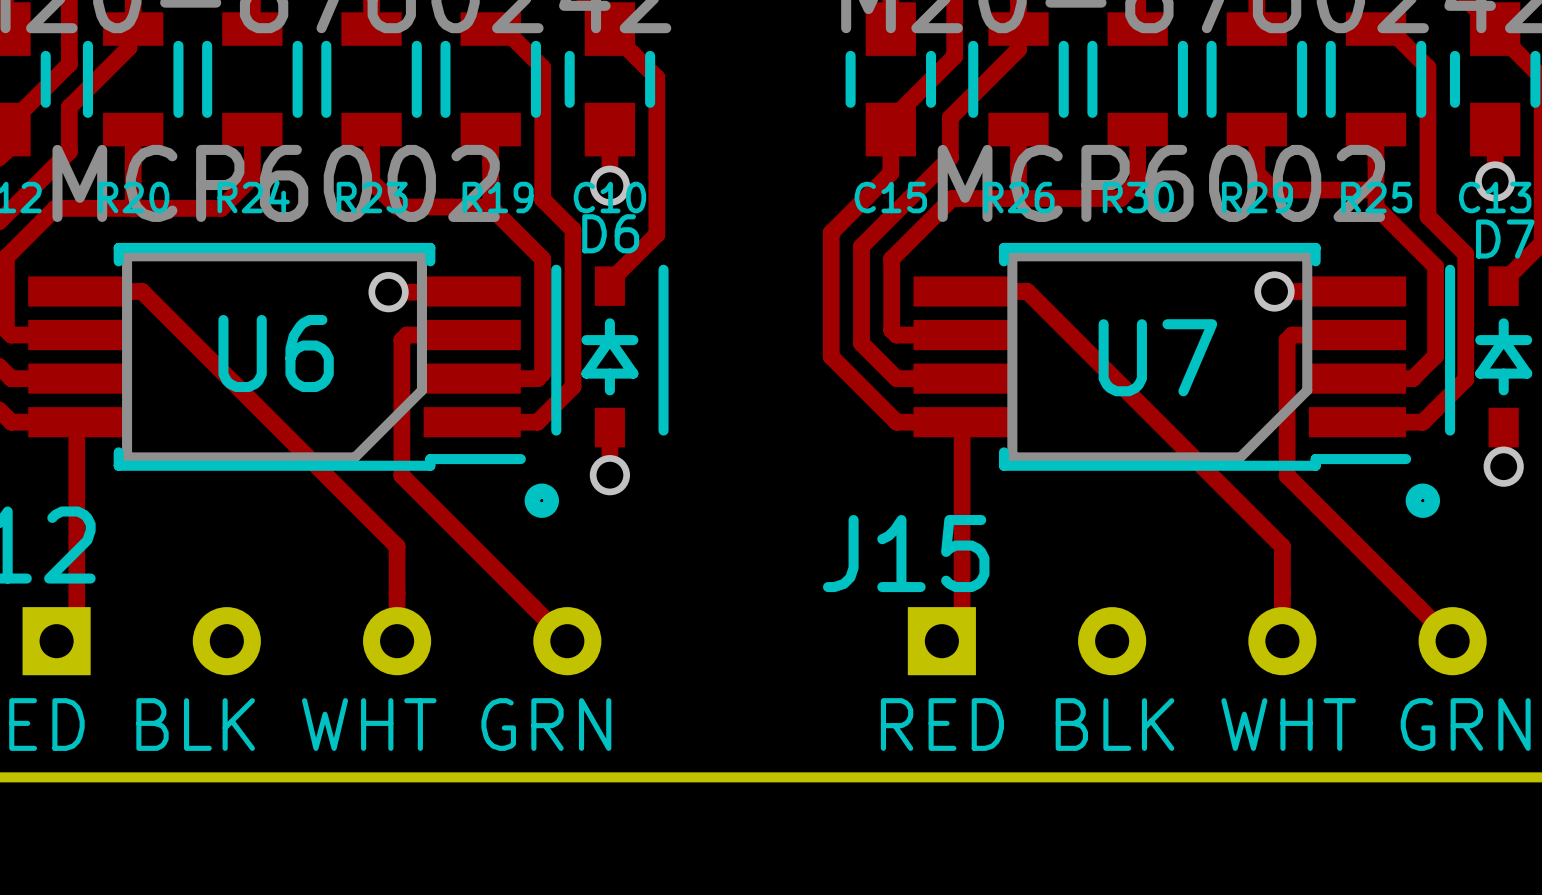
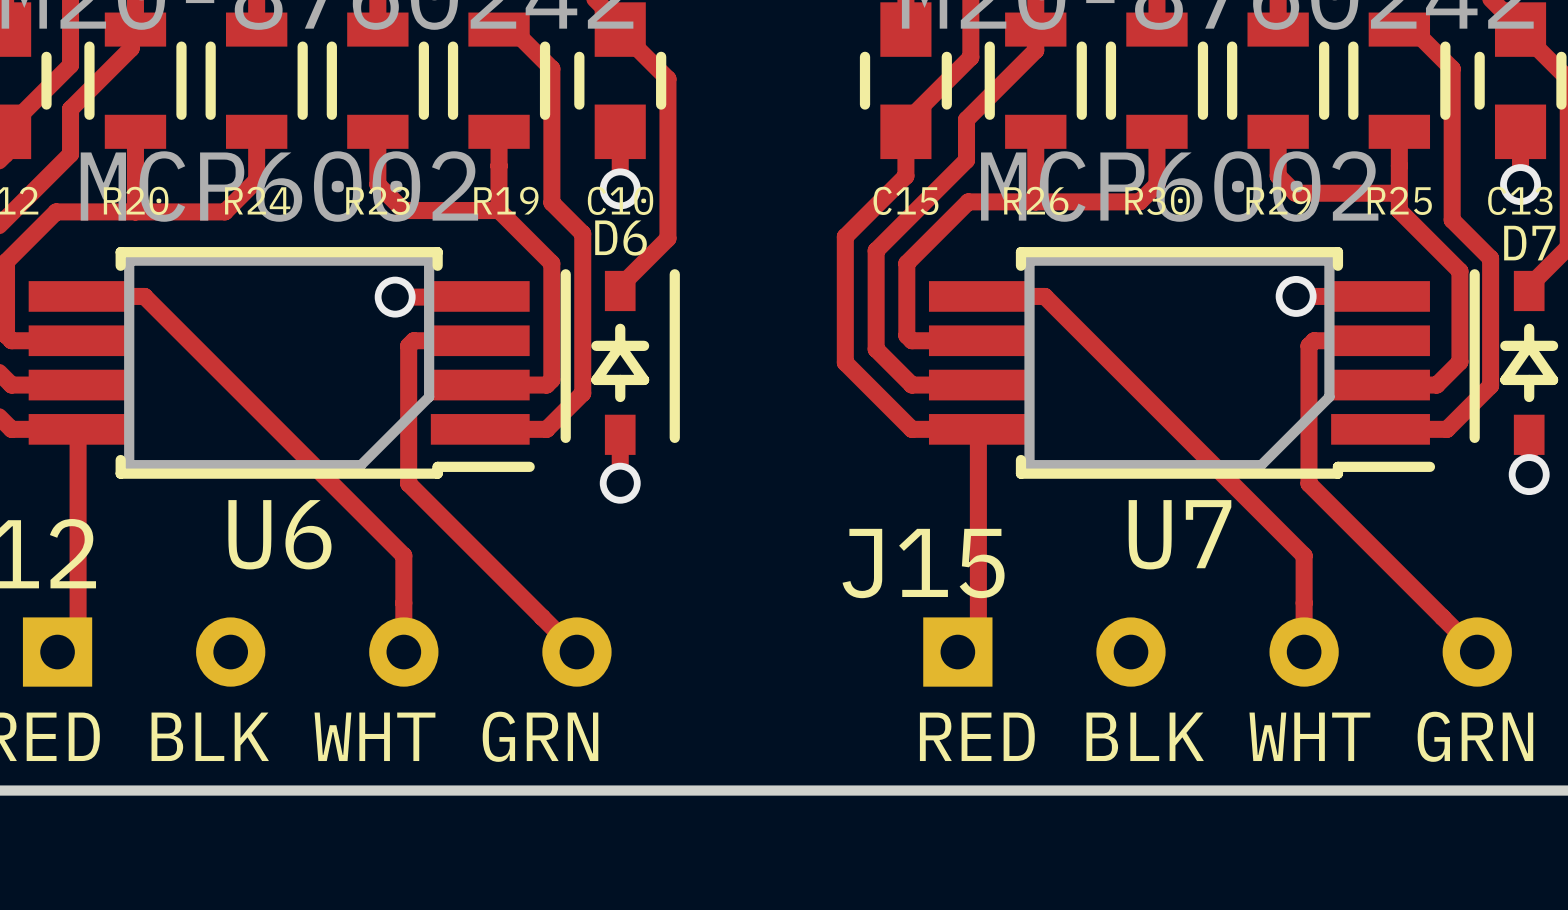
U6 name position: U6 (276, 353) -> U6 (279, 534)
U7 name position: U7 (1157, 357) -> U7 (1180, 534)
drawing: [524, 483, 559, 518] -> none
drawing: [1405, 483, 1441, 518] -> none

